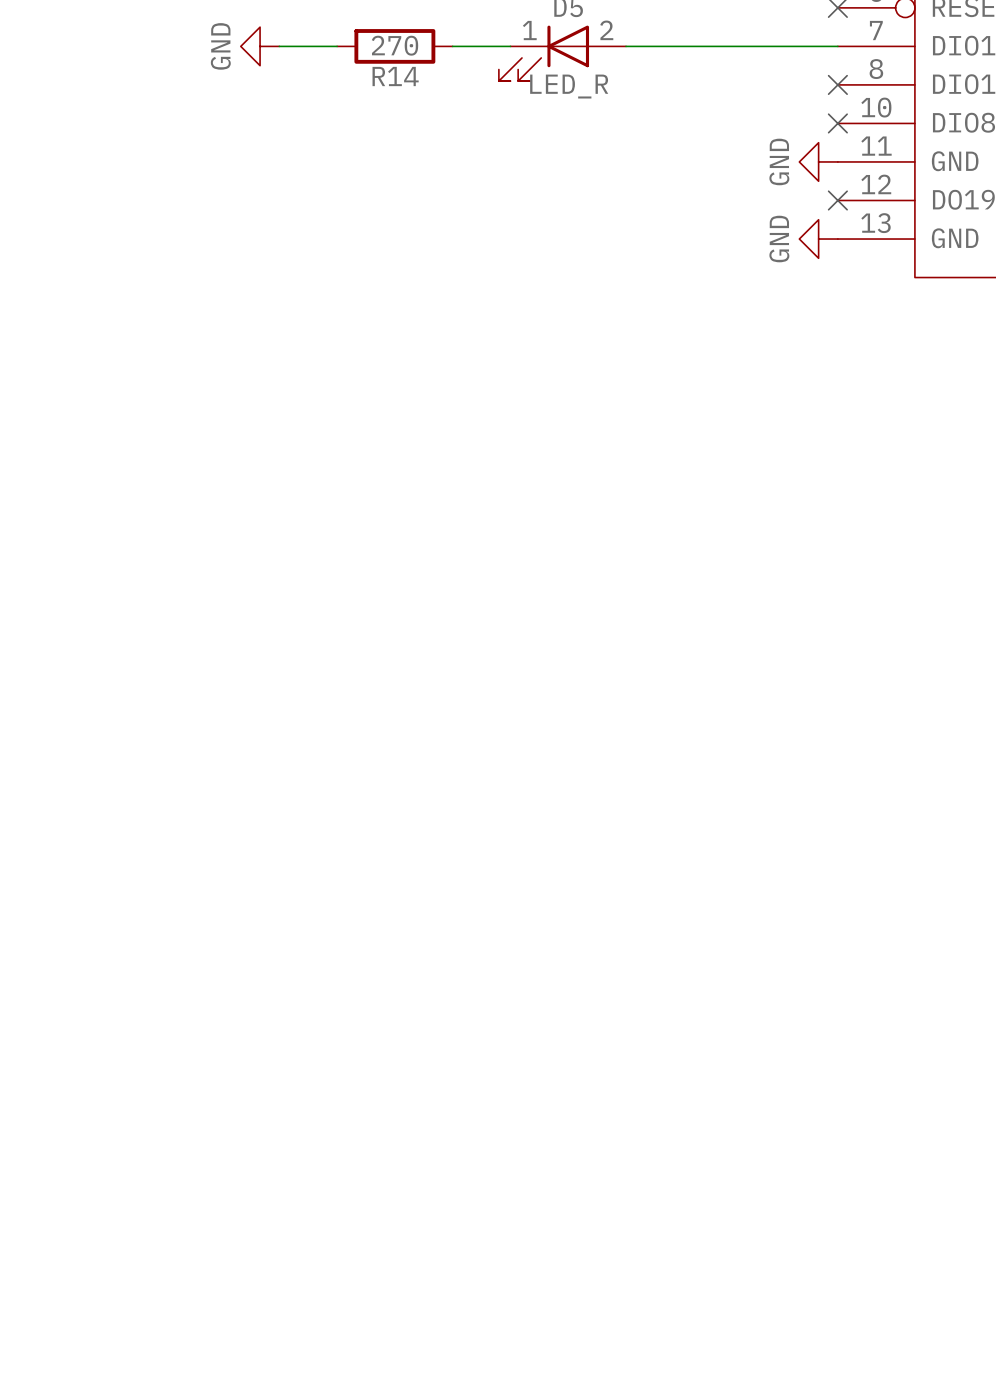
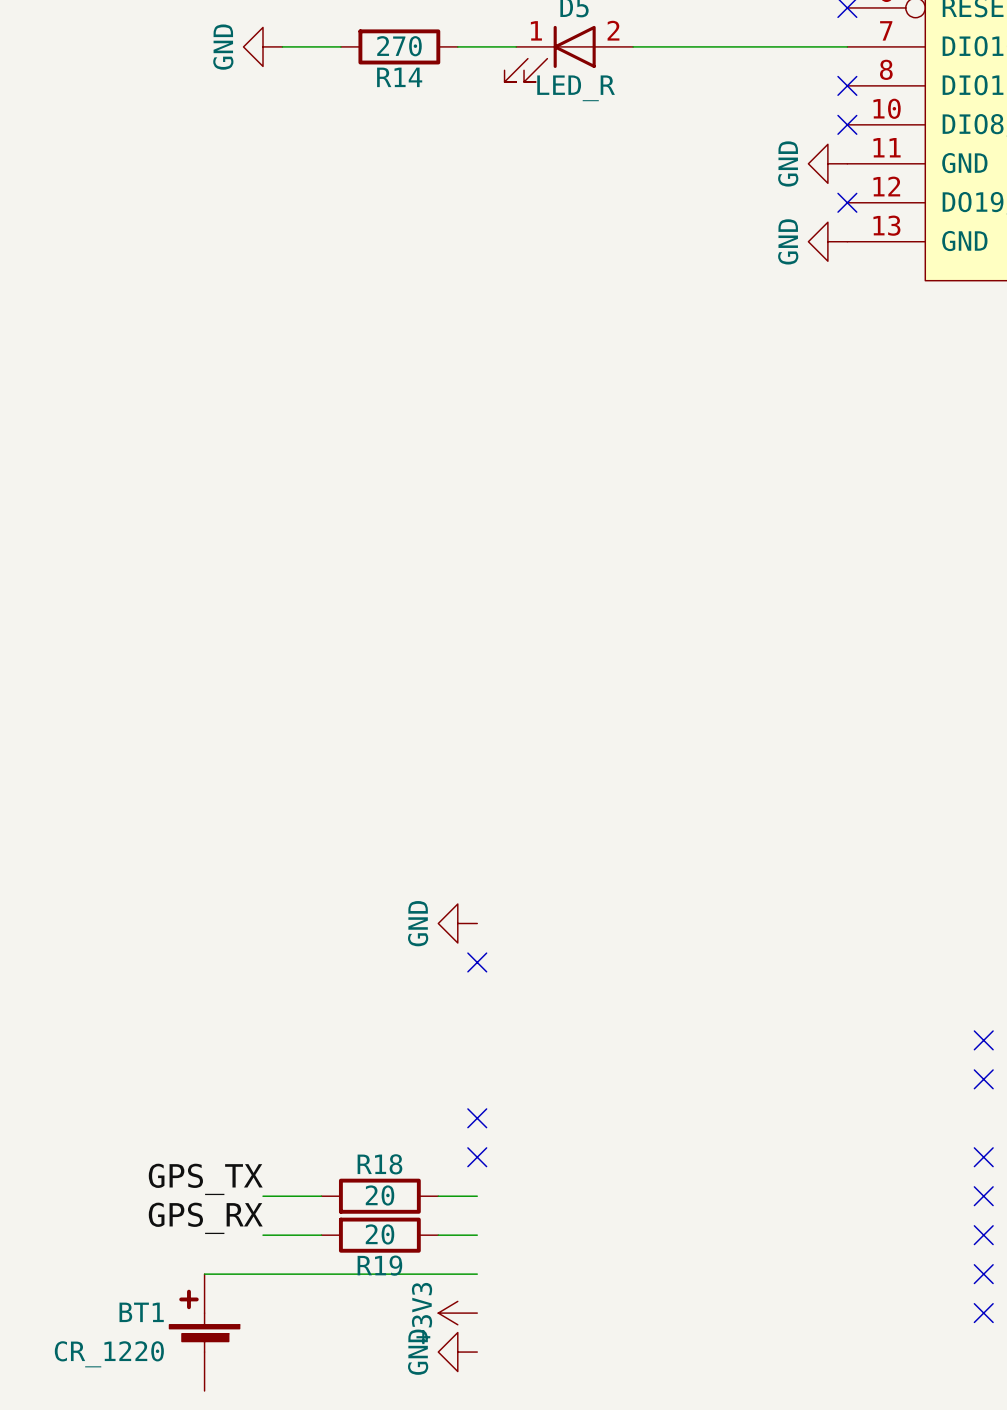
power symbol: none -> GND (457, 923)
no-connect mark: none -> (477, 962)
no-connect mark: none -> (983, 1040)
no-connect mark: none -> (983, 1079)
no-connect mark: none -> (477, 1118)
no-connect mark: none -> (477, 1157)
no-connect mark: none -> (983, 1157)
label: none -> GPS_TX (205, 1179)
wire: none -> (263, 1196) (321, 1196)
R18: none -> 20 (379, 1196)
wire: none -> (438, 1196) (477, 1196)
no-connect mark: none -> (983, 1196)
label: none -> GPS_RX (205, 1218)
wire: none -> (263, 1235) (321, 1235)
R19: none -> 20 (379, 1235)
wire: none -> (438, 1235) (477, 1235)
no-connect mark: none -> (983, 1235)
wire: none -> (204, 1274) (477, 1274)
no-connect mark: none -> (983, 1274)
power symbol: none -> +3V3 (457, 1313)
no-connect mark: none -> (983, 1313)
BT1: none -> CR_1220 (204, 1332)
power symbol: none -> GND (457, 1352)

